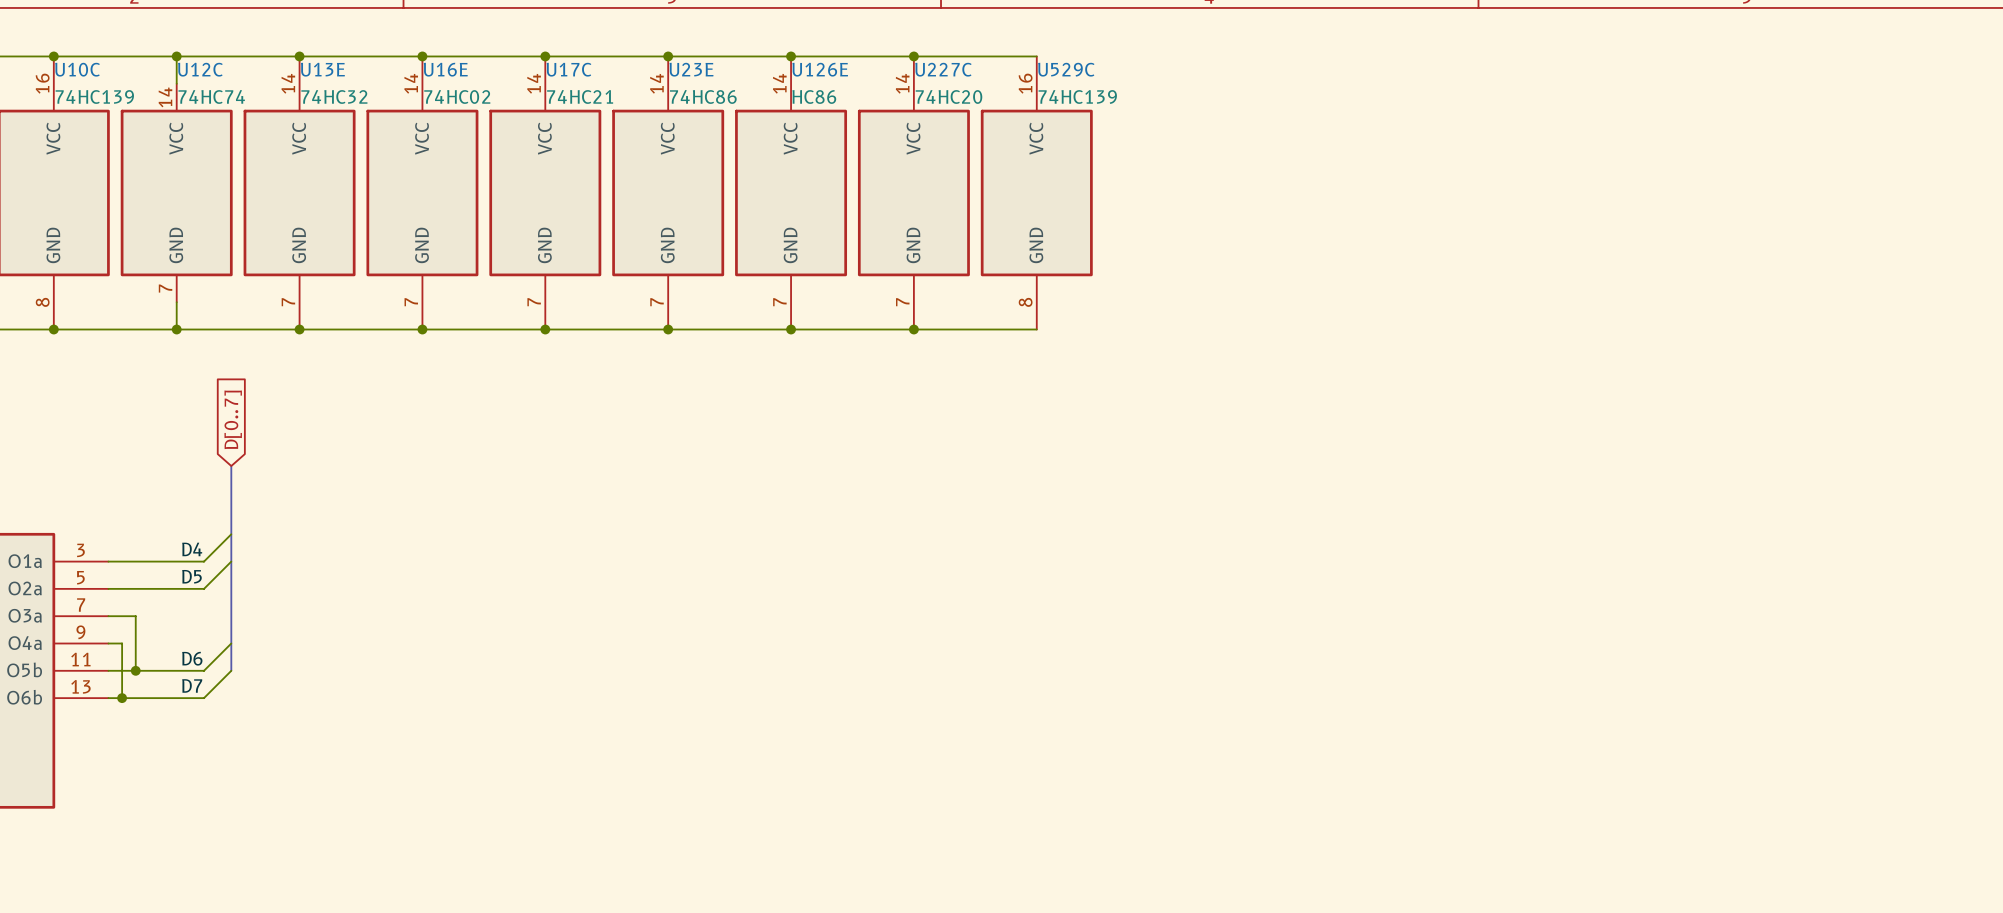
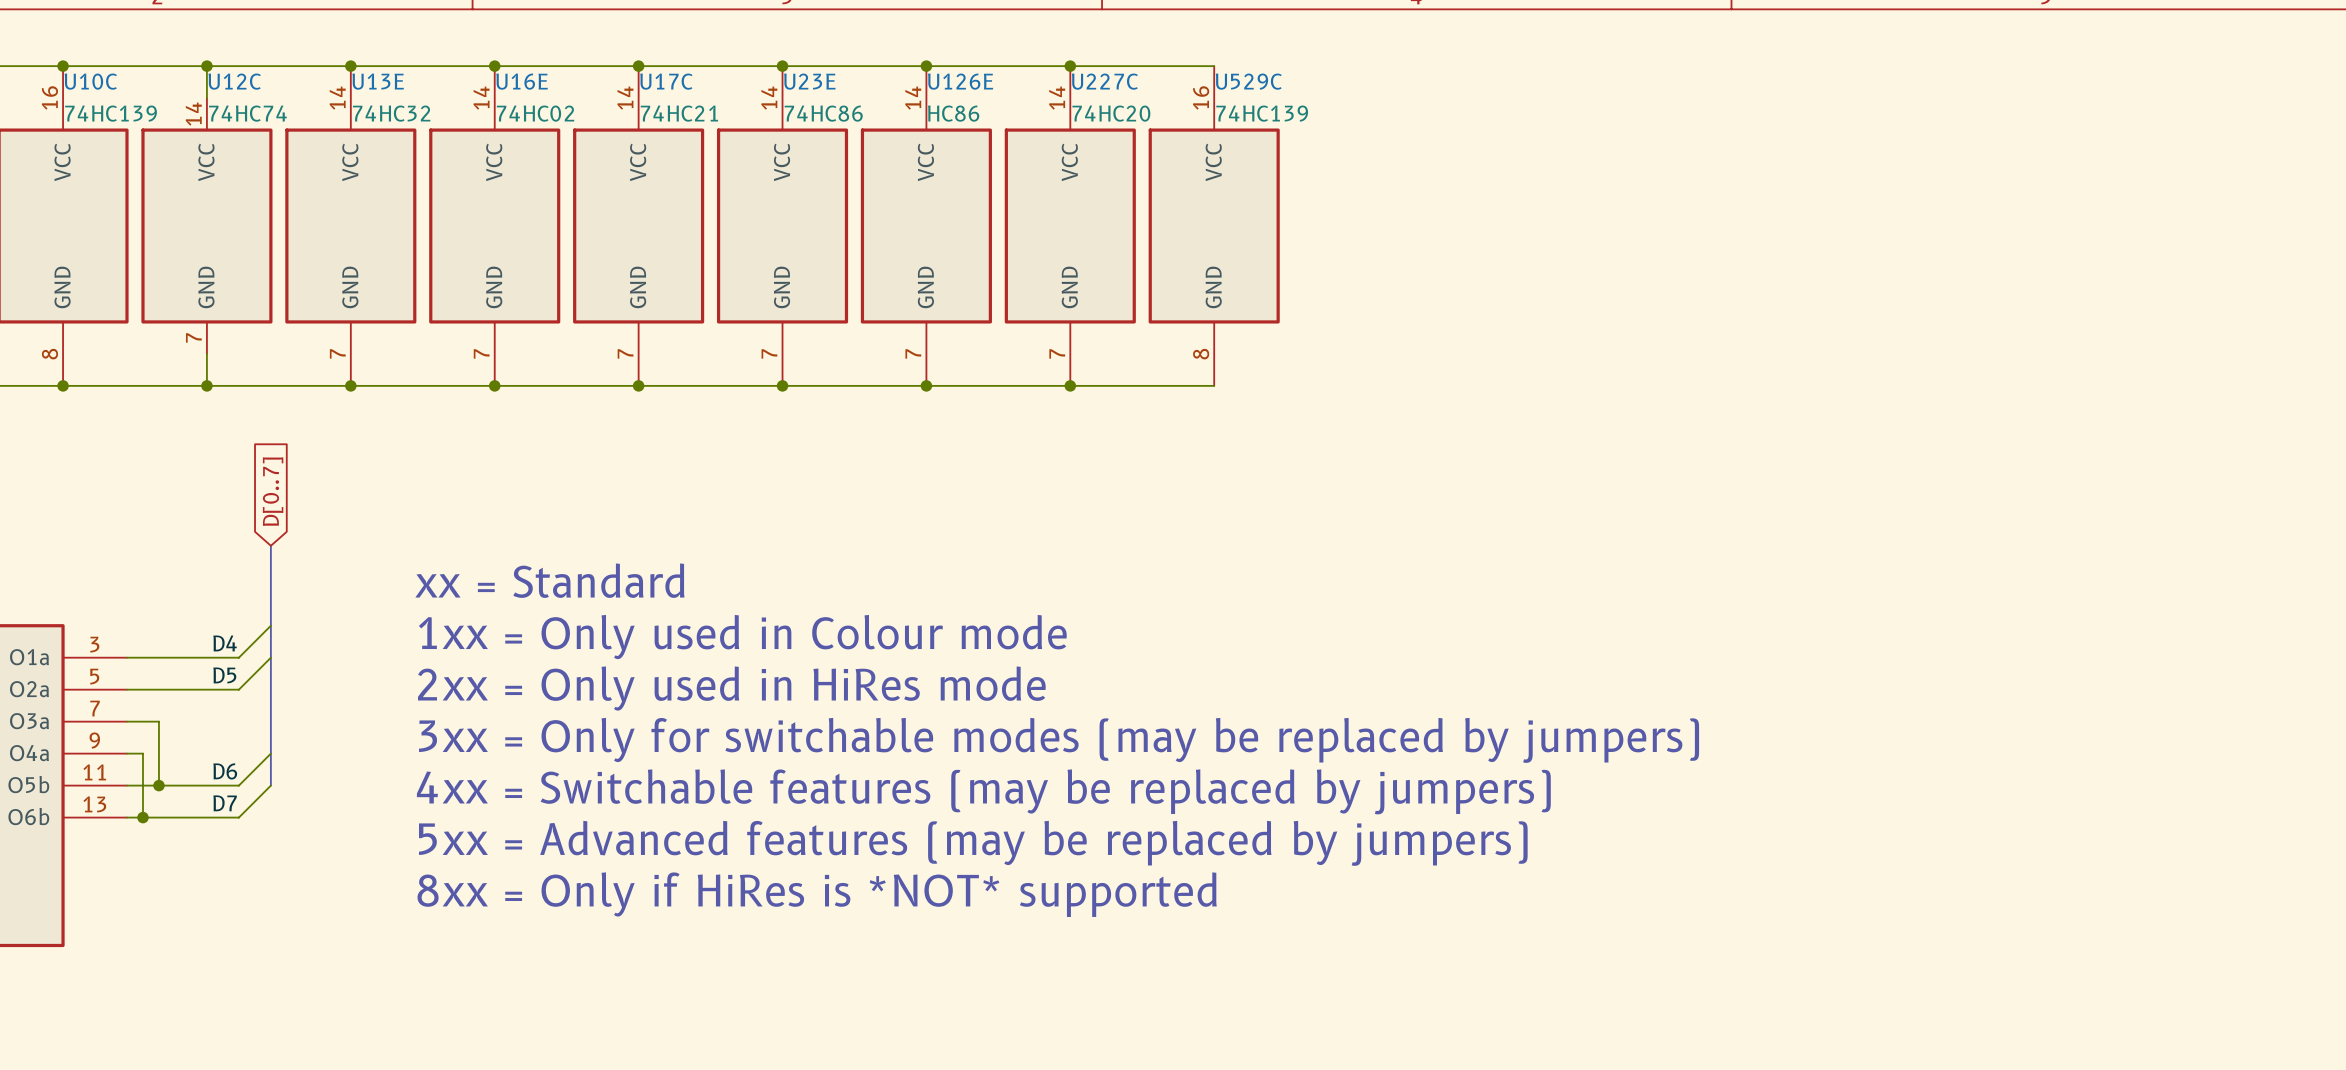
text: none -> xx = Standard (549, 580)
text: none -> 1xx = Only used in Colour mode (742, 637)
text: none -> 2xx = Only used in HiRes mode (731, 688)
text: none -> 3xx = Only for switchable modes (may be replaced by jumpers) (1059, 740)
text: none -> 4xx = Switchable features (may be replaced by jumpers) (983, 791)
text: none -> 5xx = Advanced features (may be replaced by jumpers) (973, 843)
text: none -> 8xx = Only if HiRes is *NOT* supported (817, 894)

